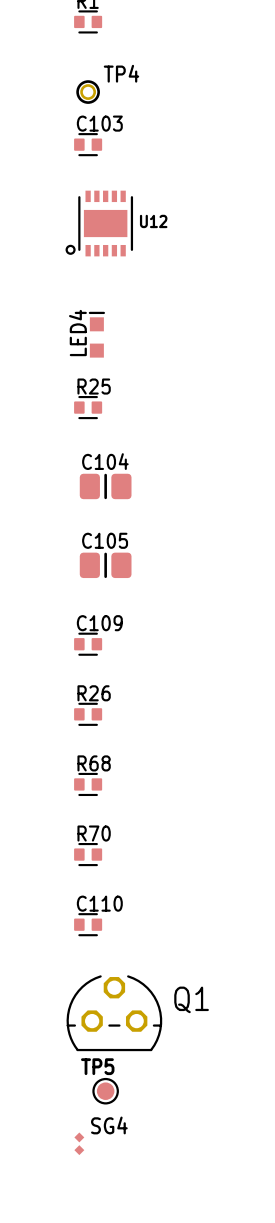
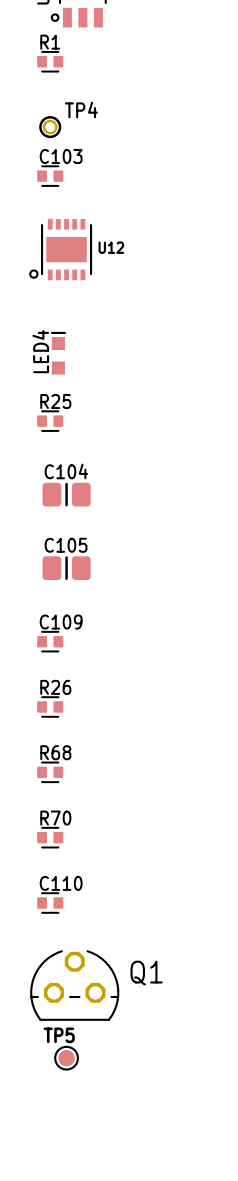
SG4: (79, 1143) -> none

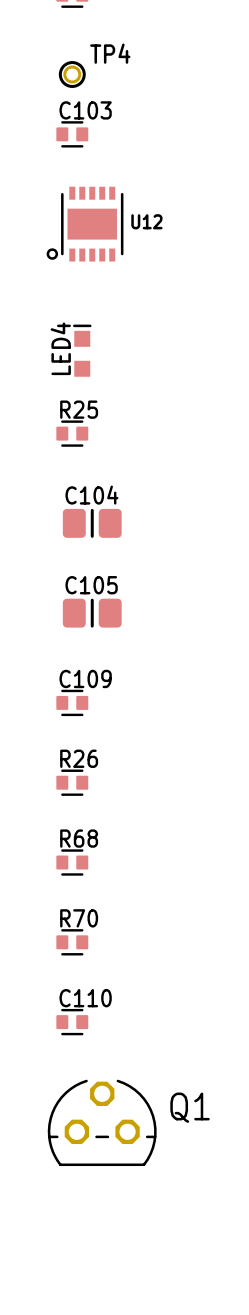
TP5: (66, 1058) -> none

